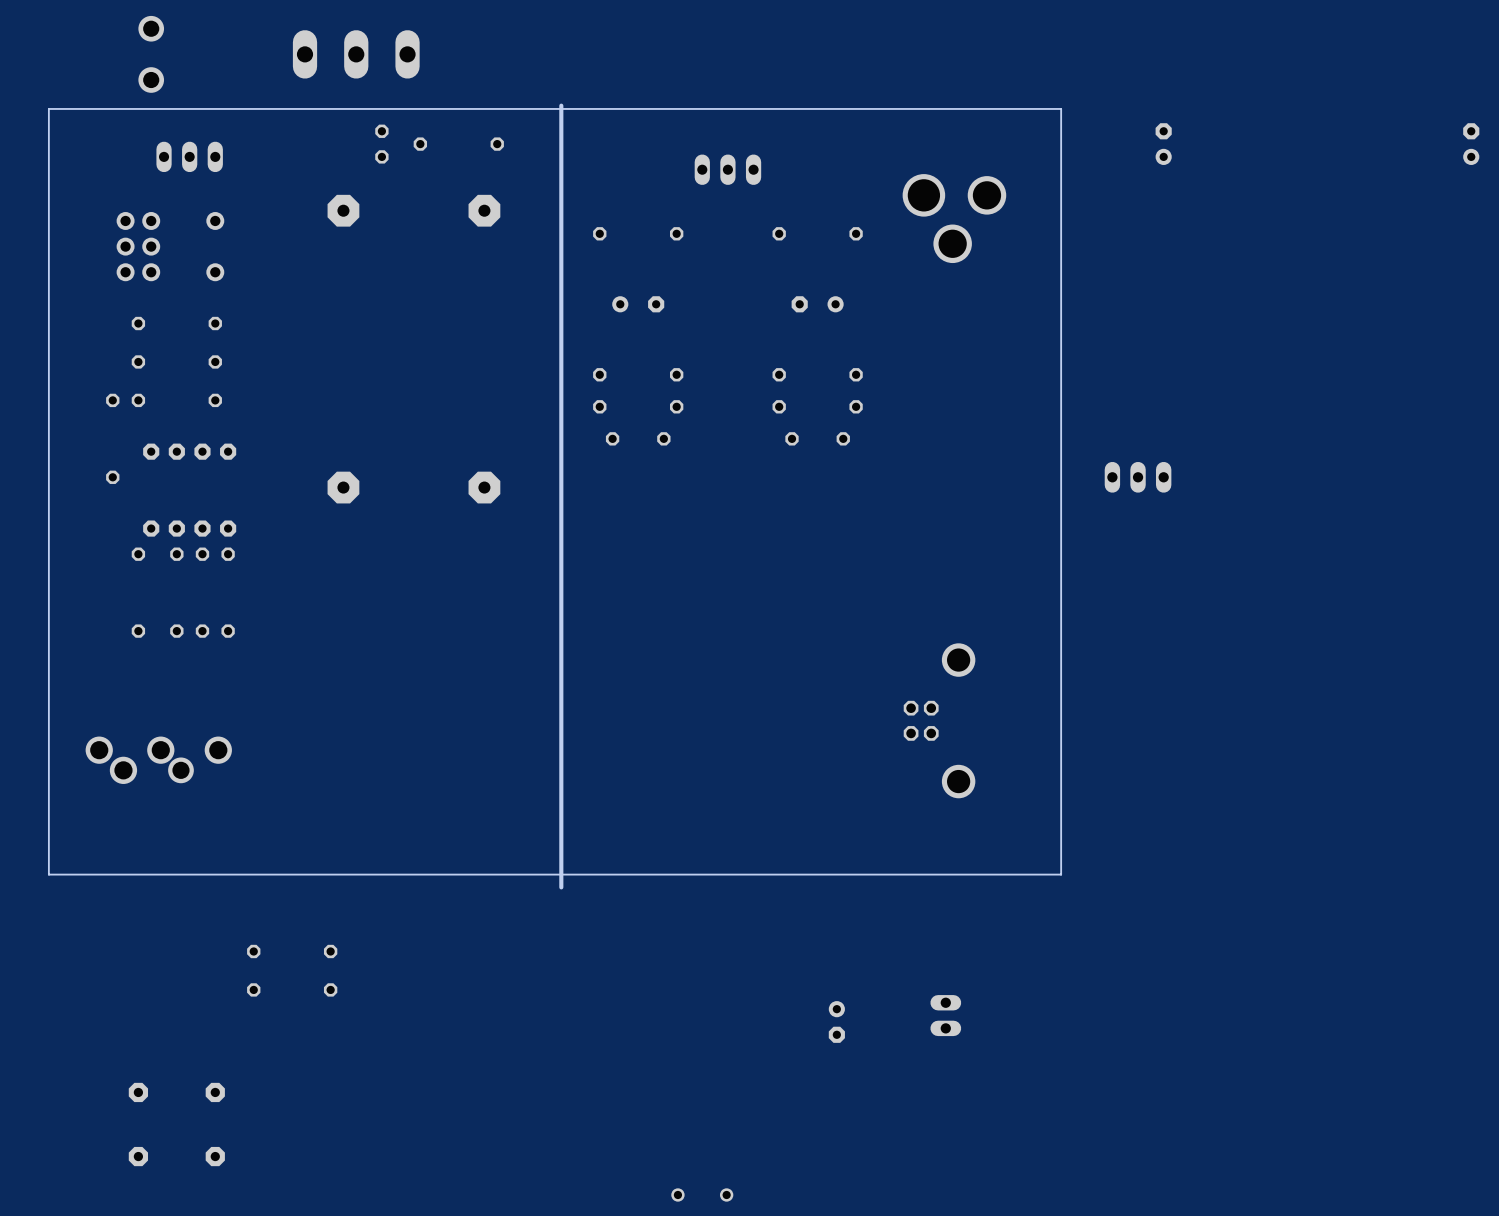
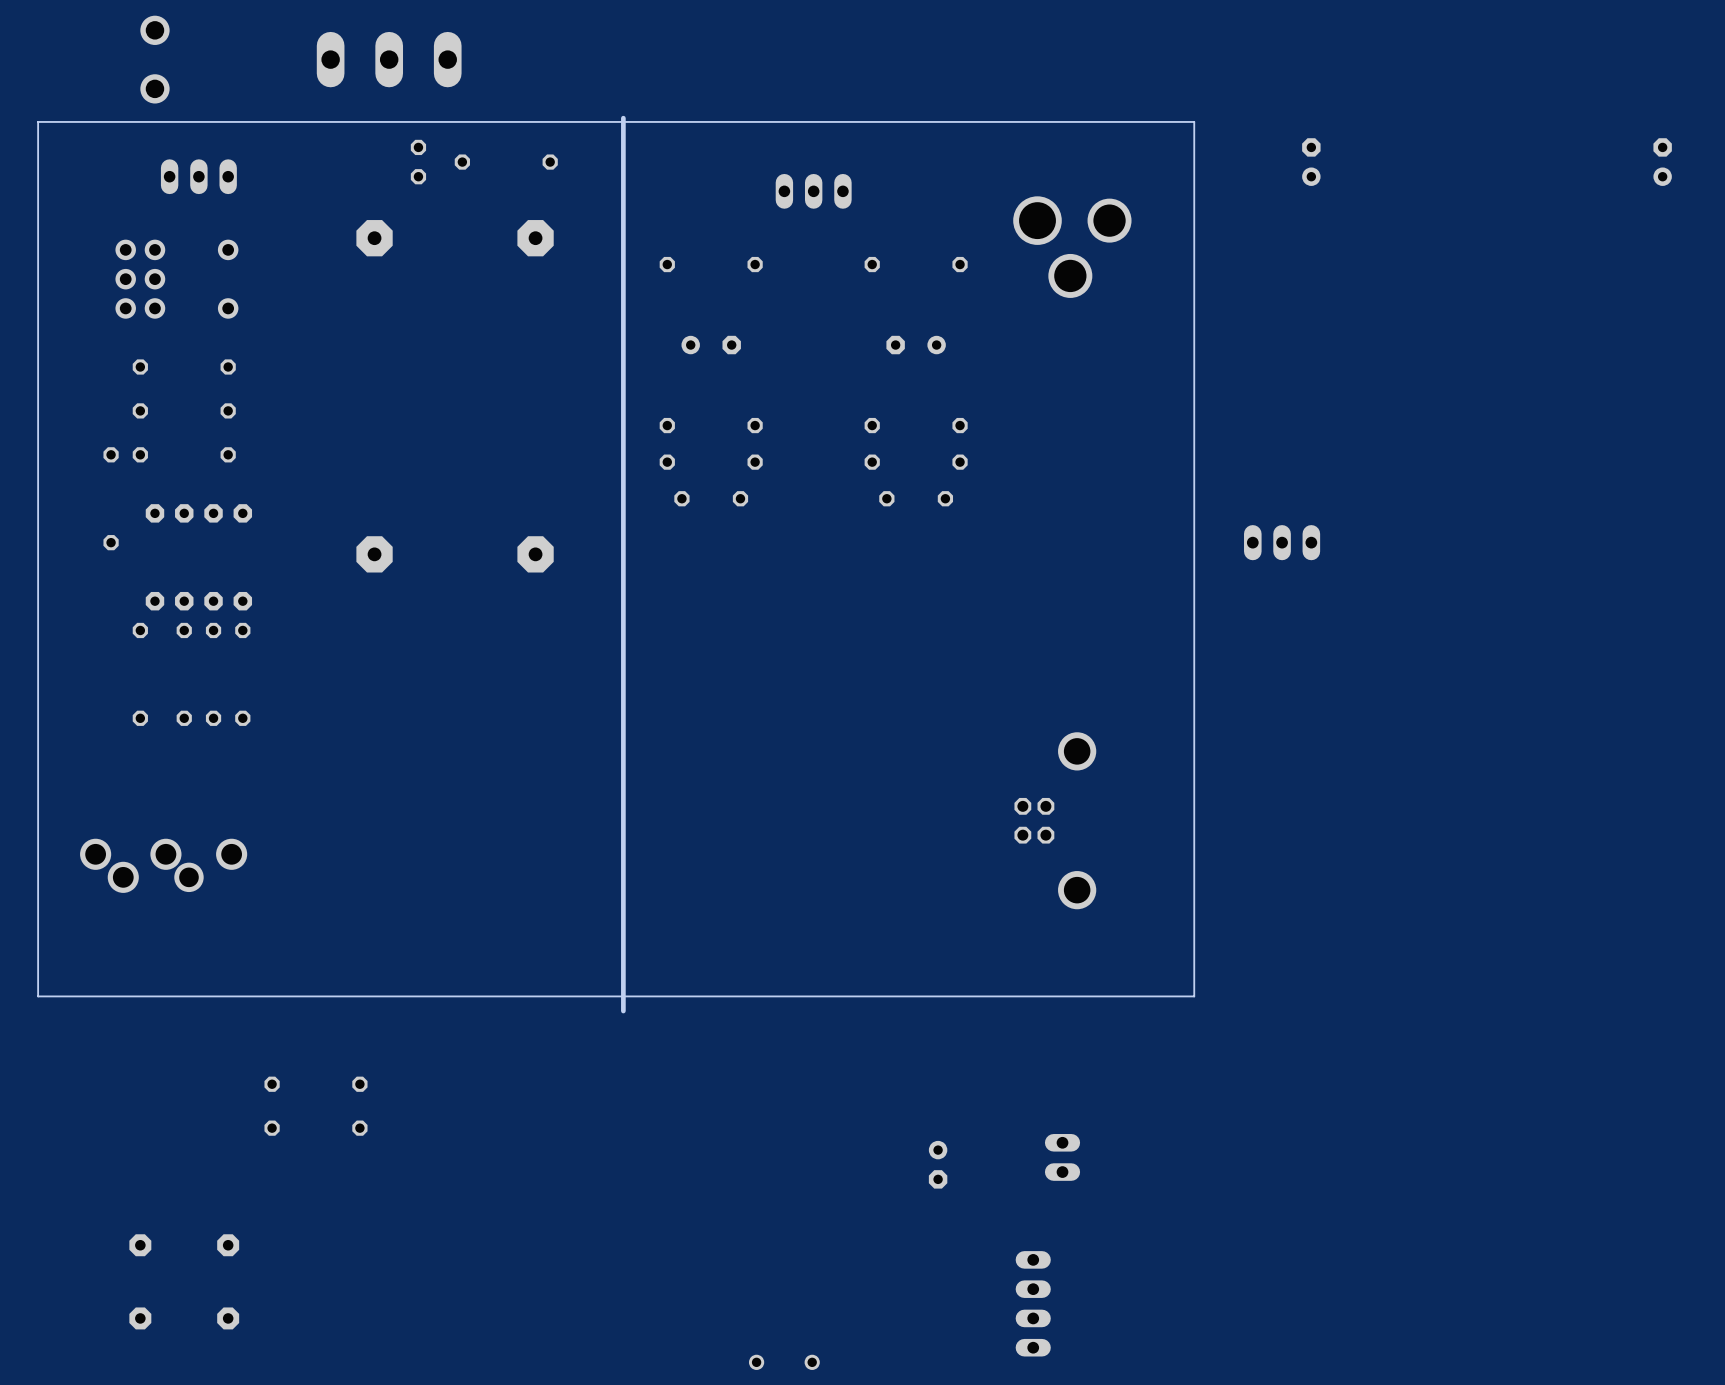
part: none -> (1033, 1303)

